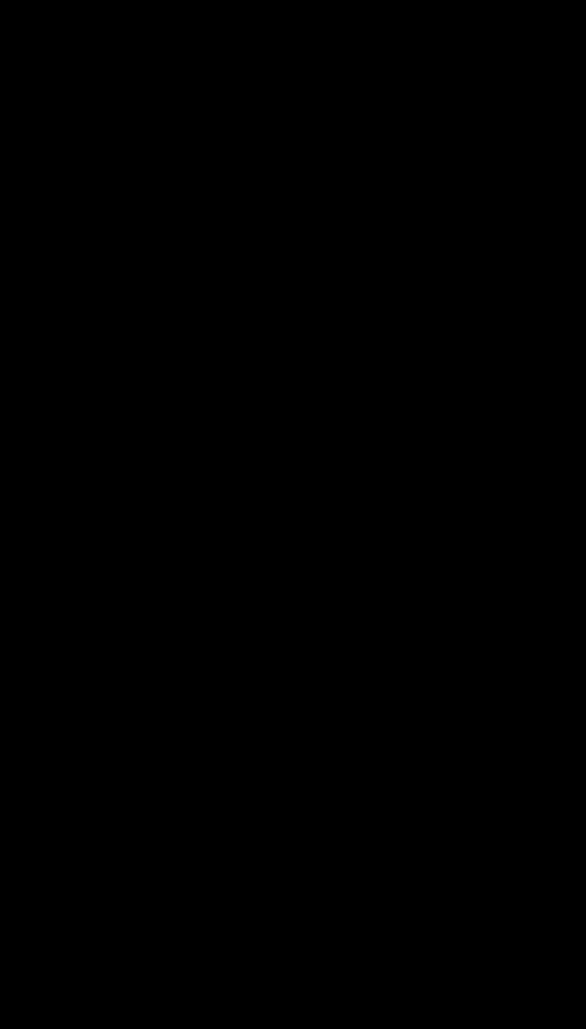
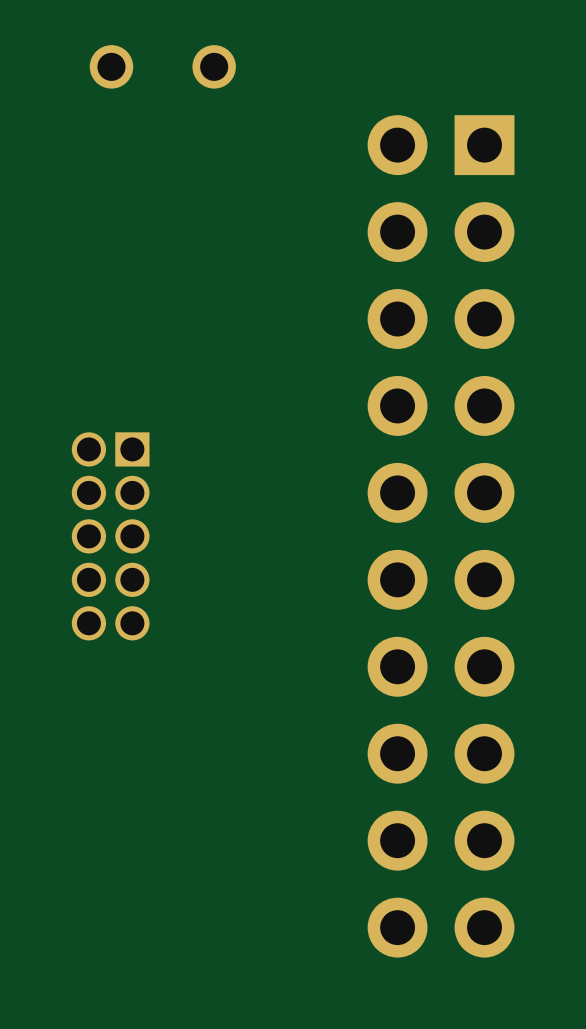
part: none -> (162, 66)
part: none -> (110, 536)
part: none -> (441, 536)

